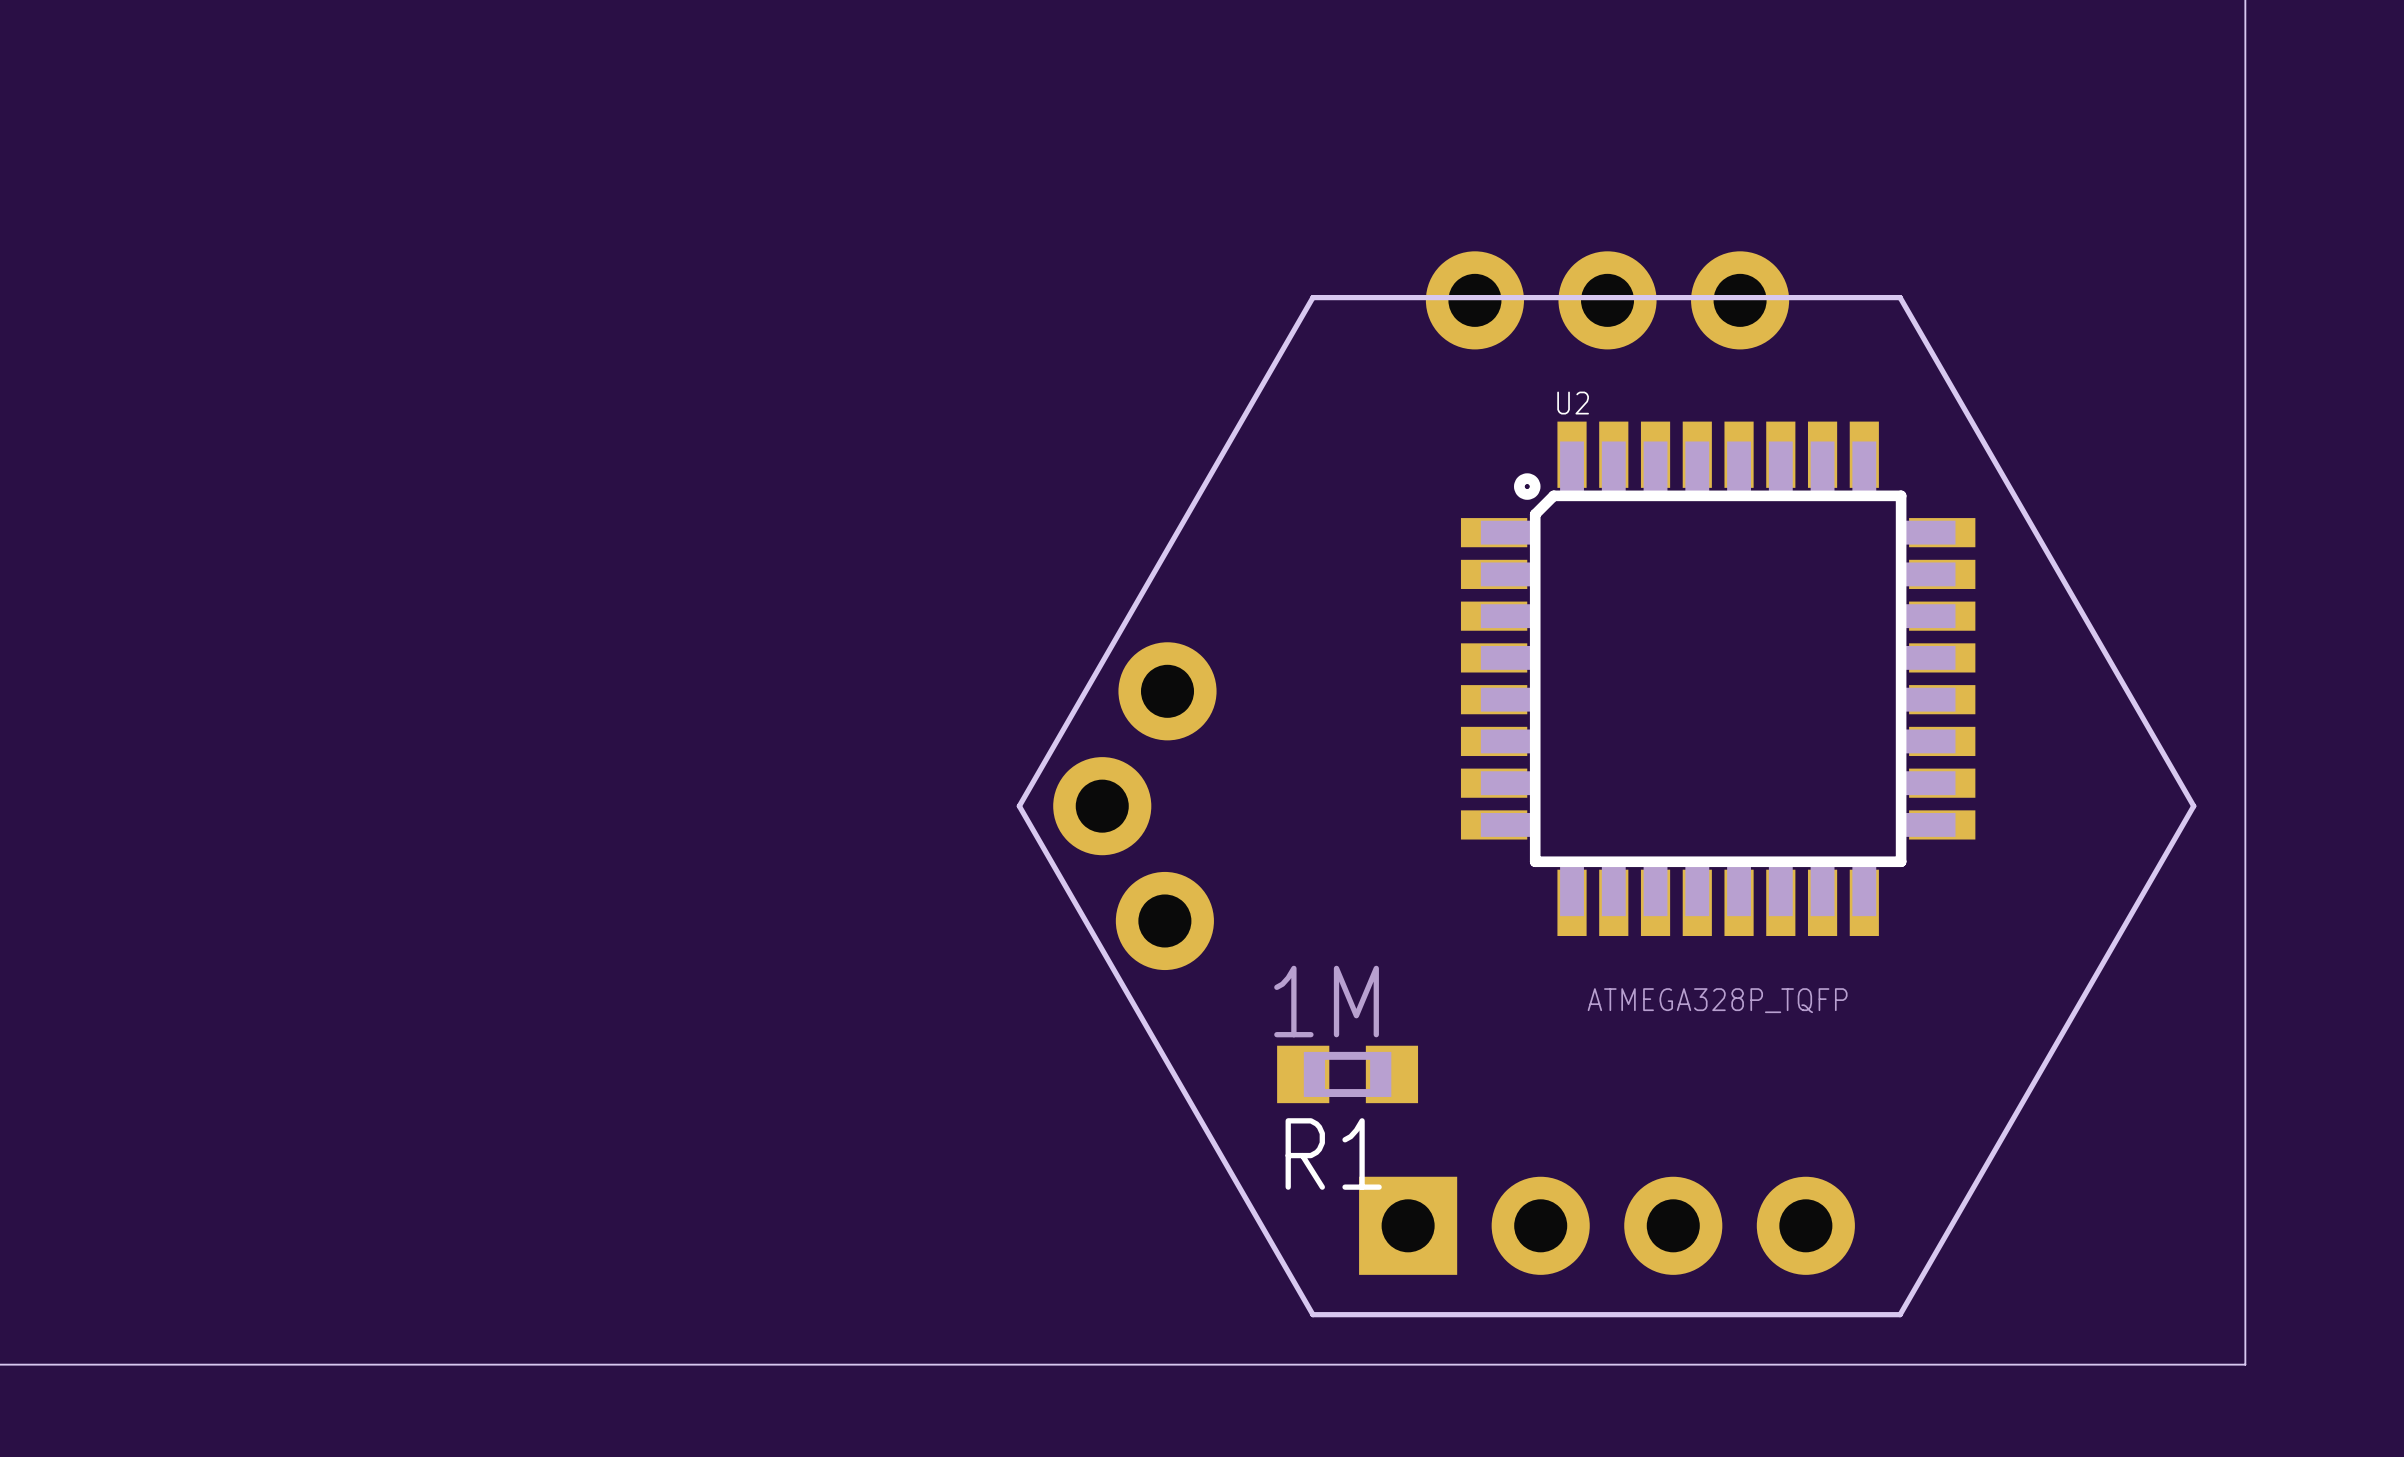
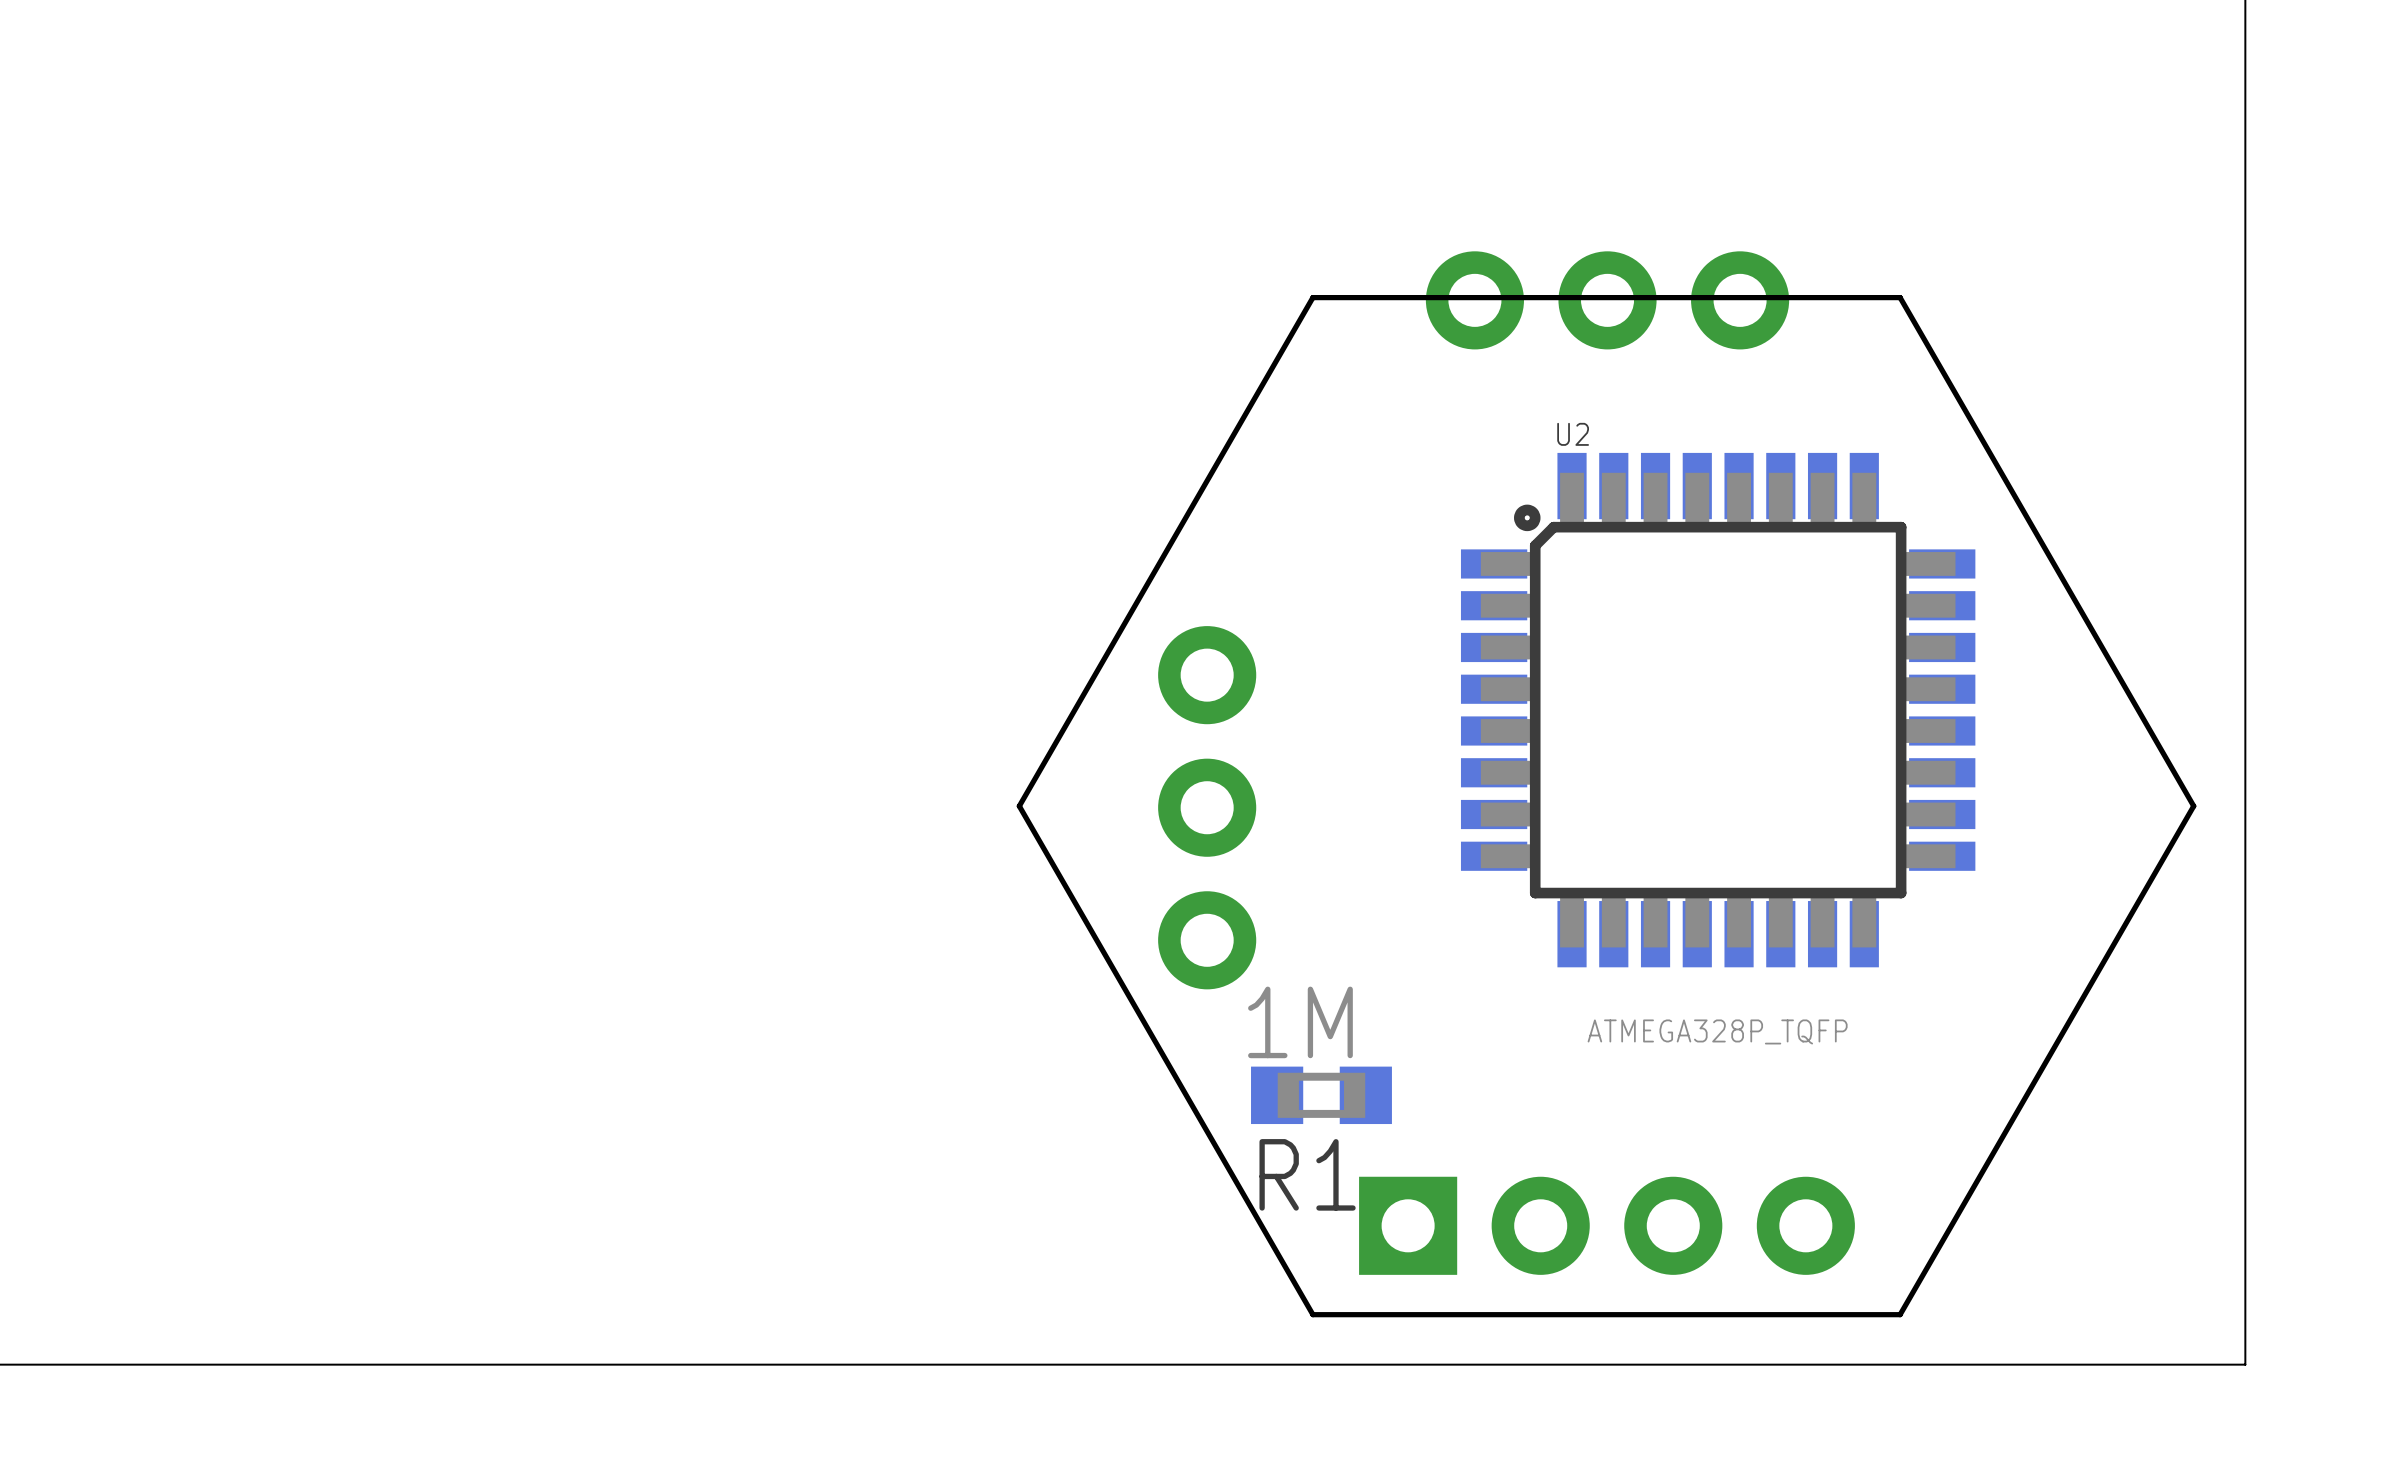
U2 position: (1718, 678) -> (1718, 710)
part: (1167, 691) -> none
part: (1102, 806) -> none
part: none -> (1207, 807)
part: (1164, 920) -> none
R1 position: (1347, 1074) -> (1321, 1095)

